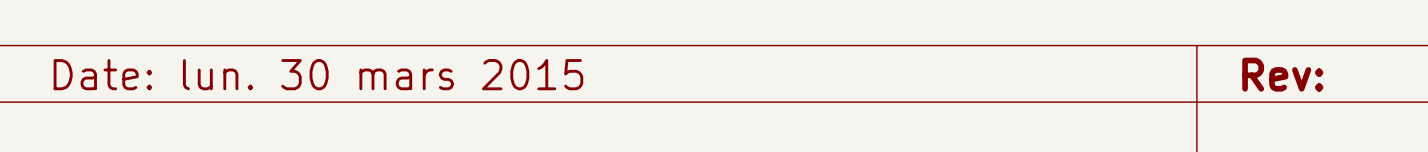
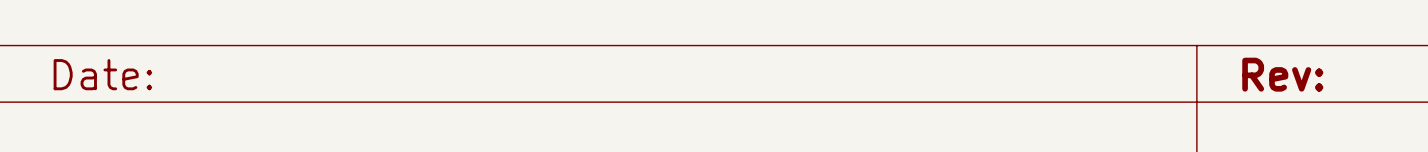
title block: Date: lun. 30 mars 2015 (318, 74) -> Date: (102, 74)

